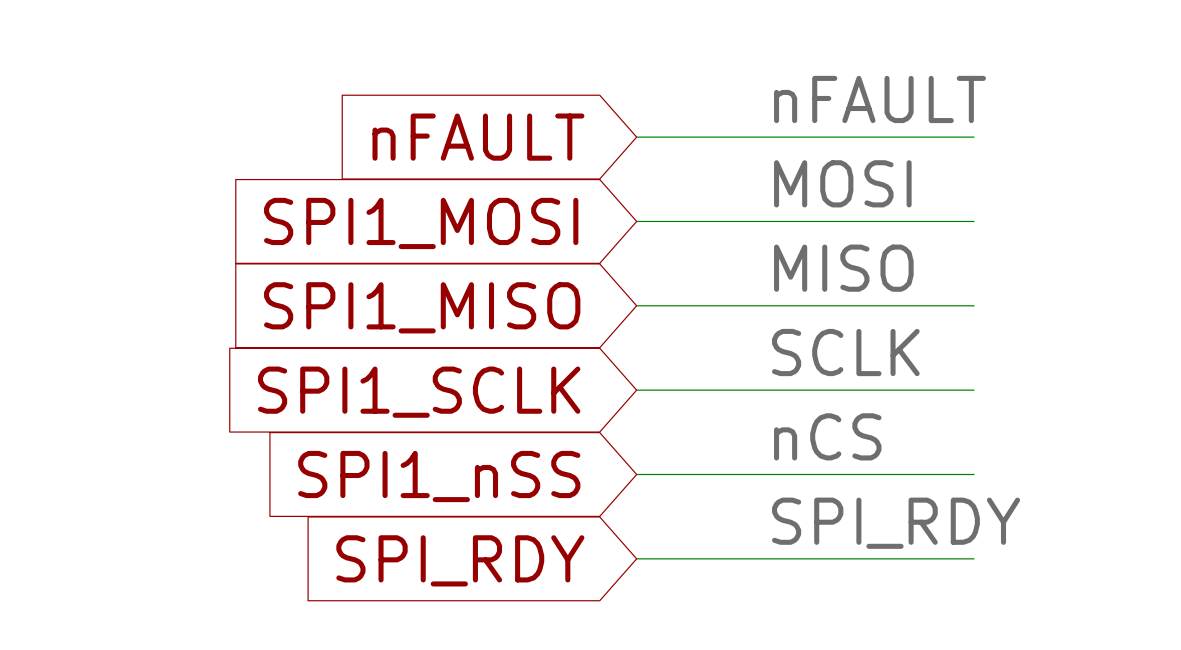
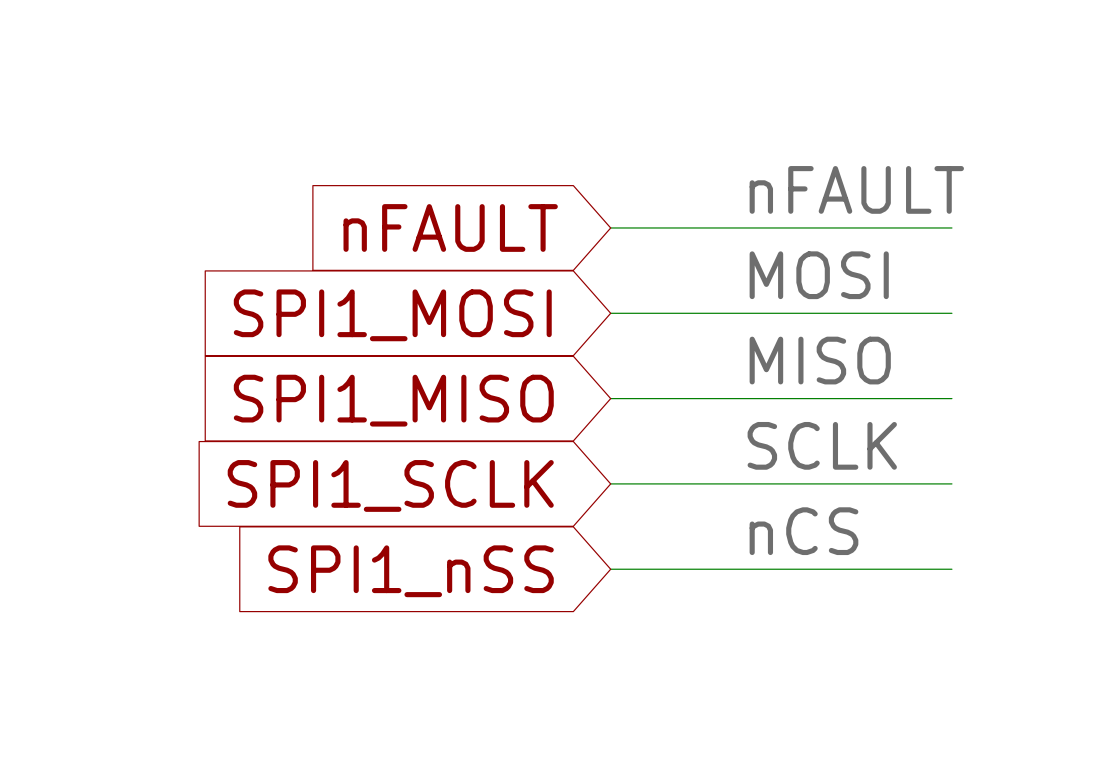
label: SPI_RDY (896, 523) -> none
wire: (636, 558) (974, 558) -> none
global label: SPI_RDY (460, 560) -> none

